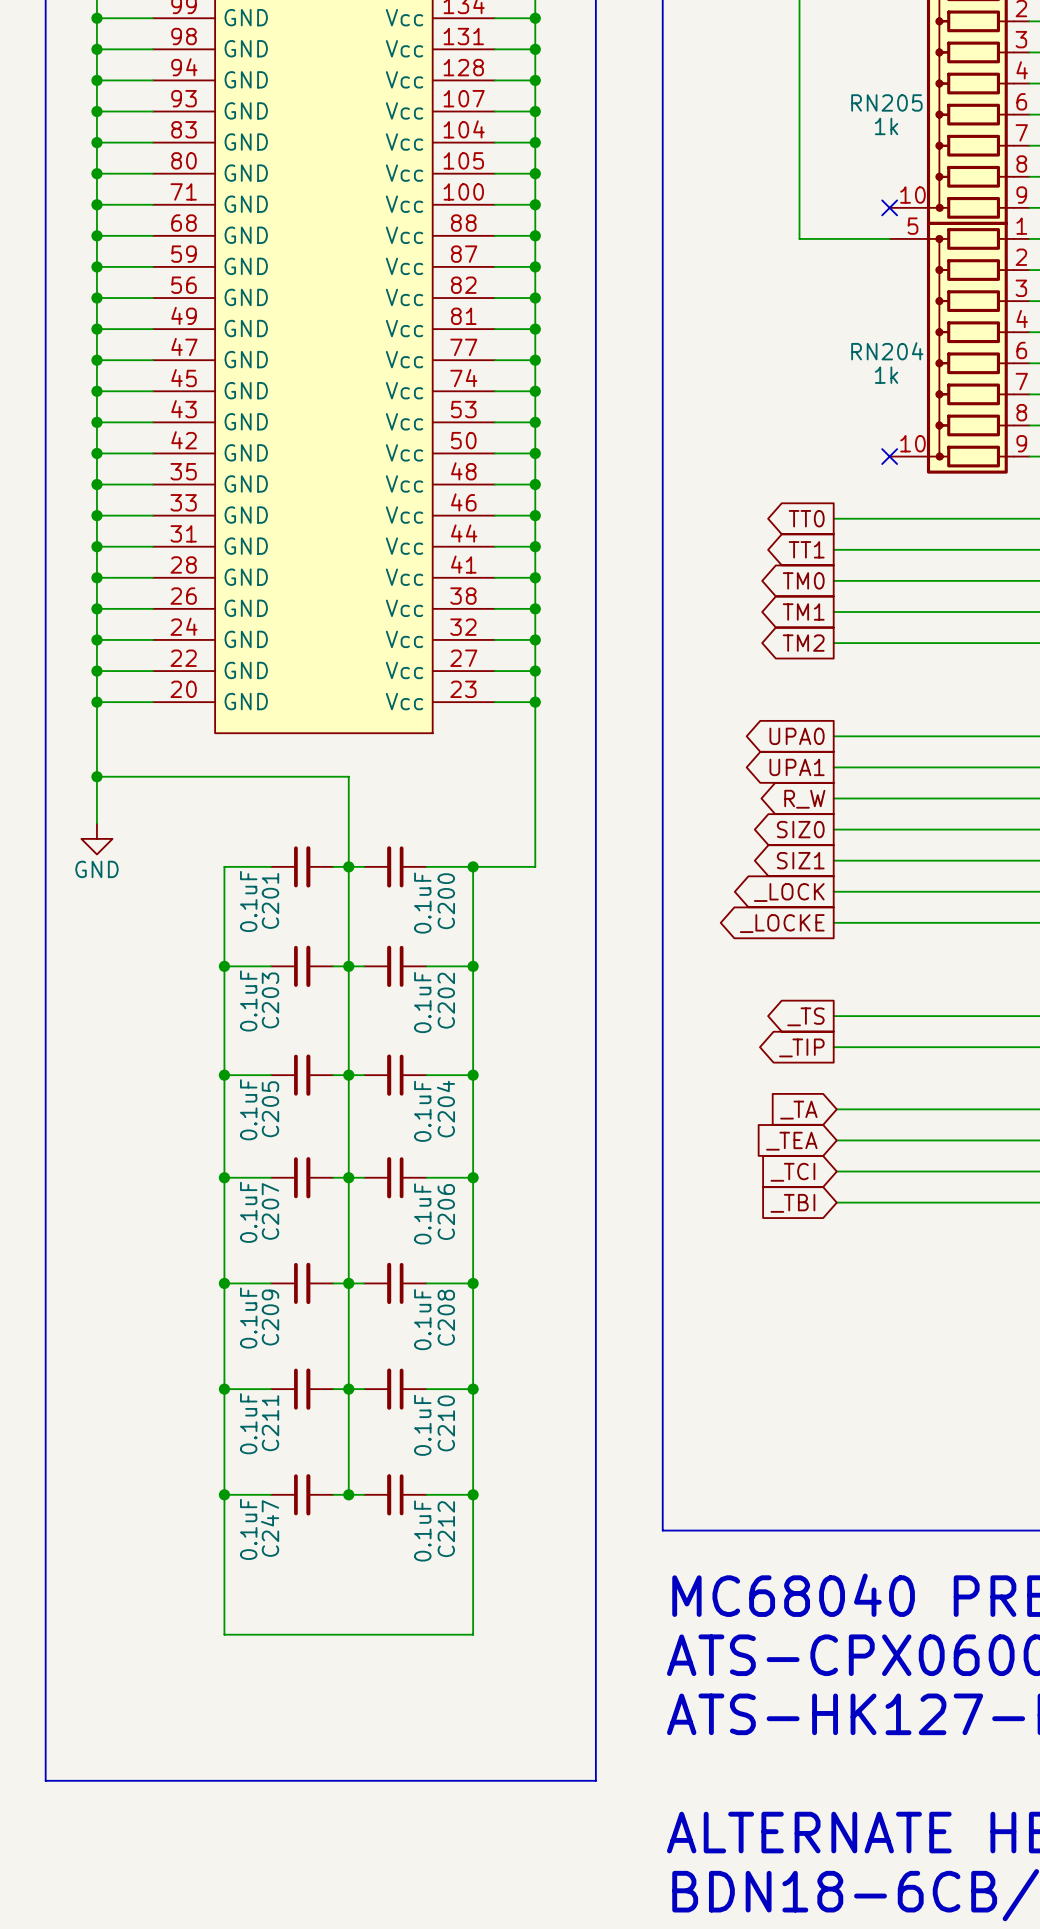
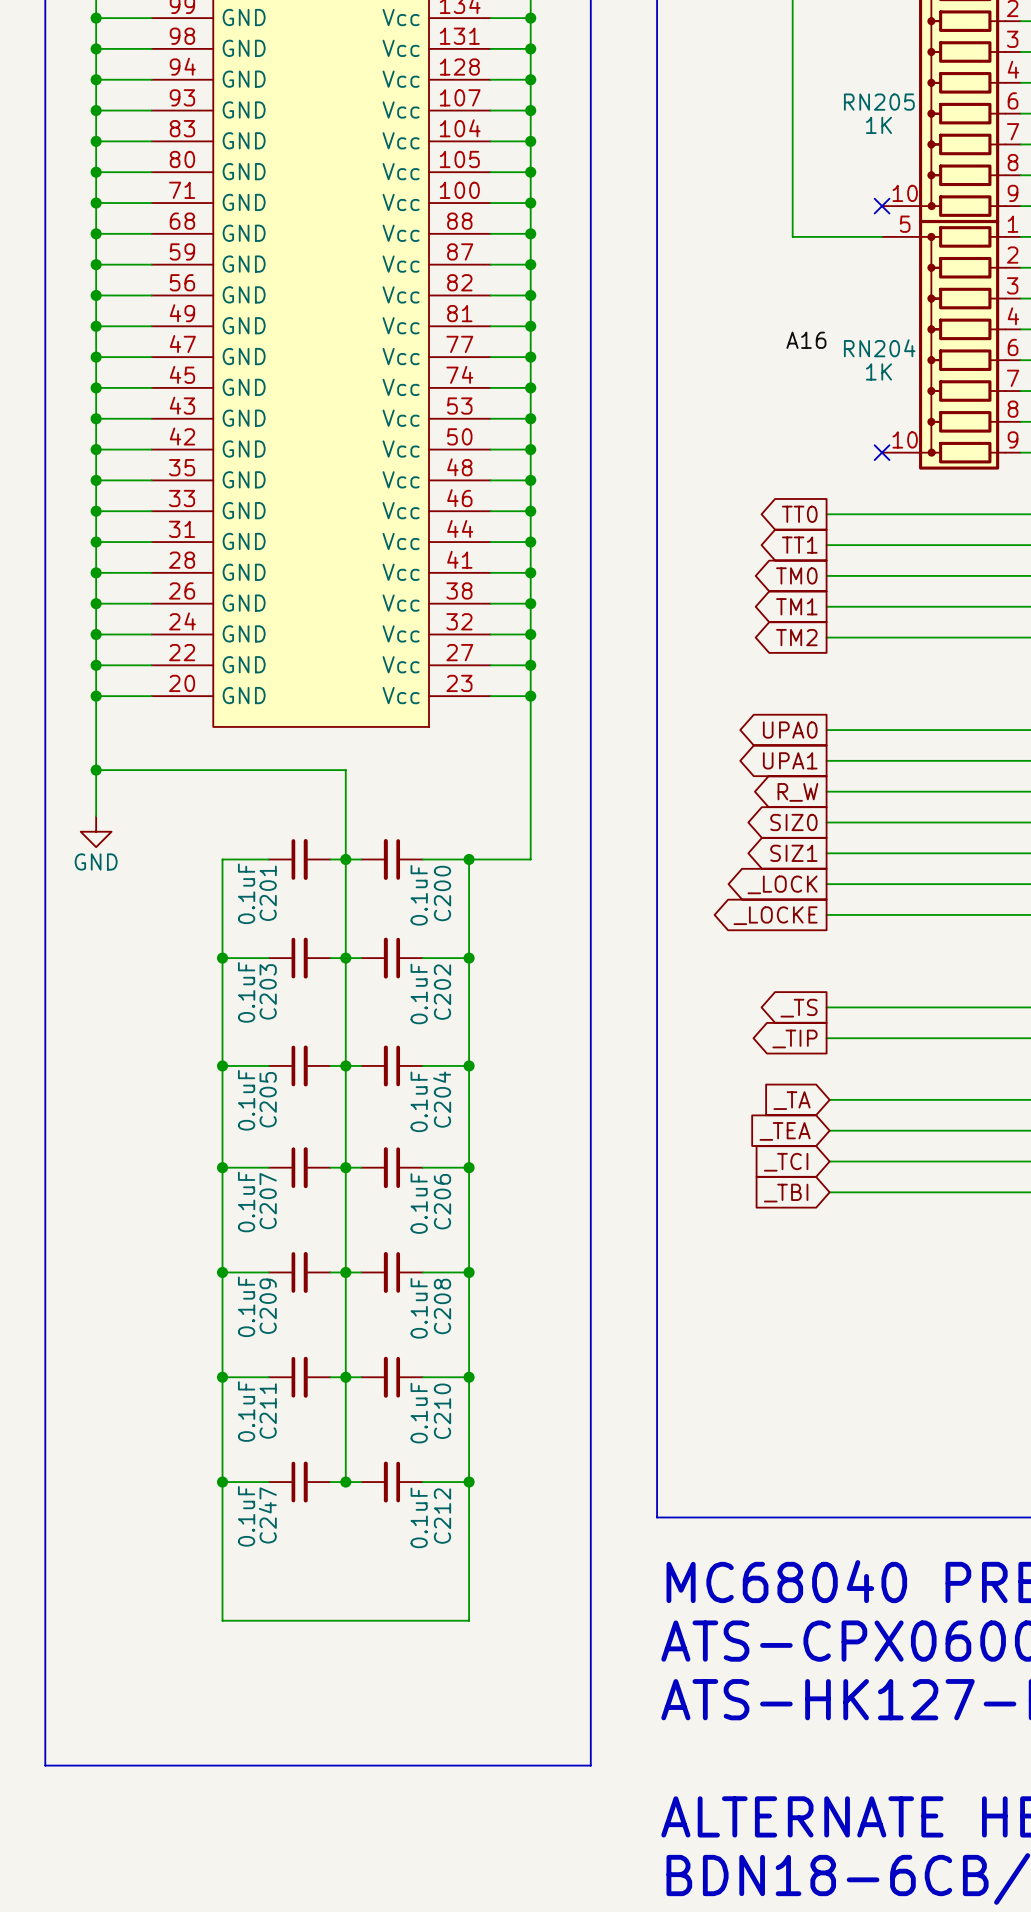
RN205 value: 1k (886, 126) -> 1K (878, 125)
label: none -> A16 (806, 340)
RN204 value: 1k (886, 375) -> 1K (878, 371)

